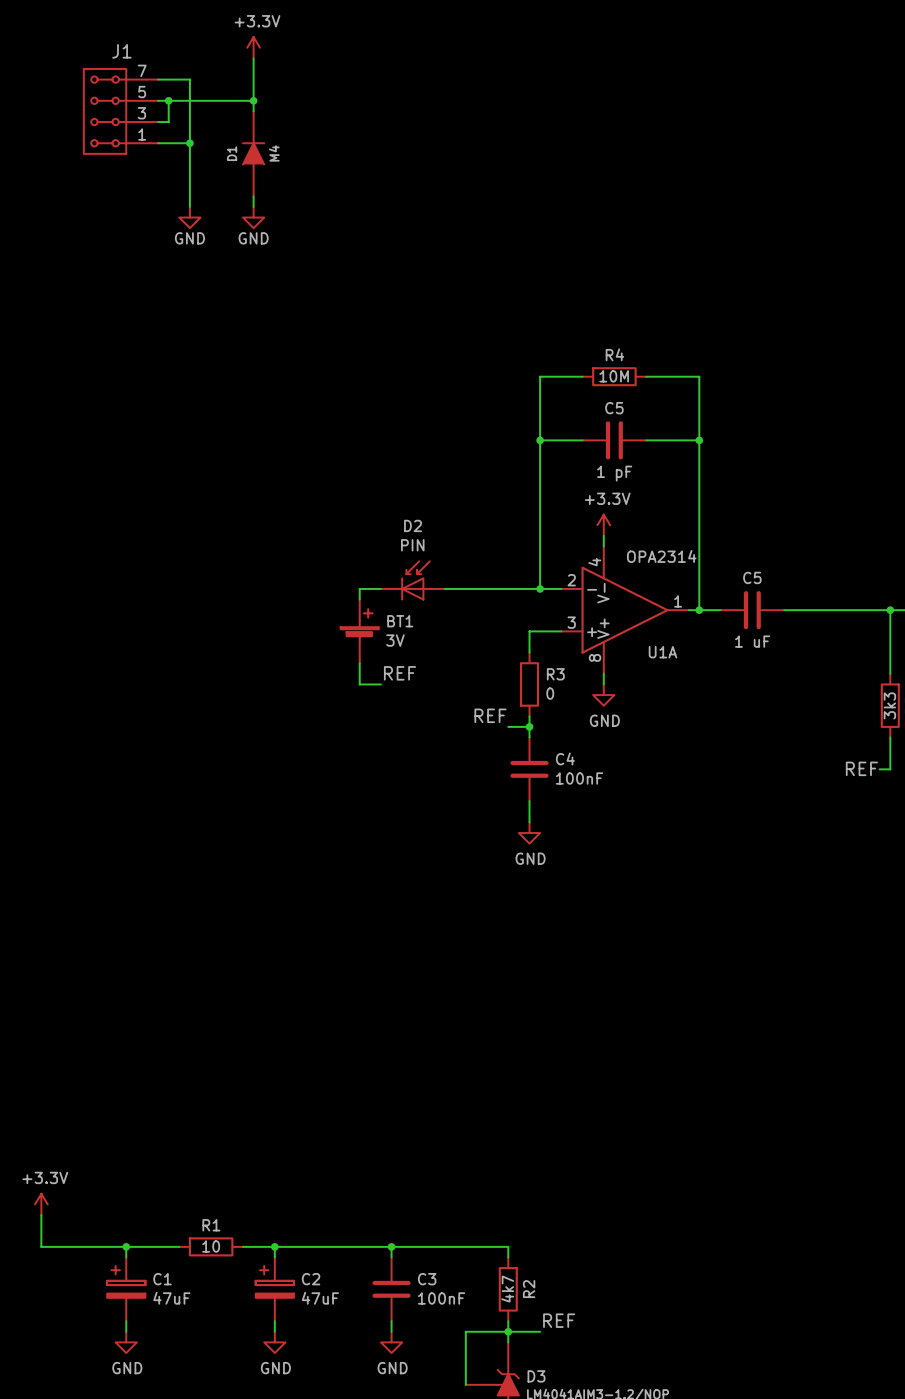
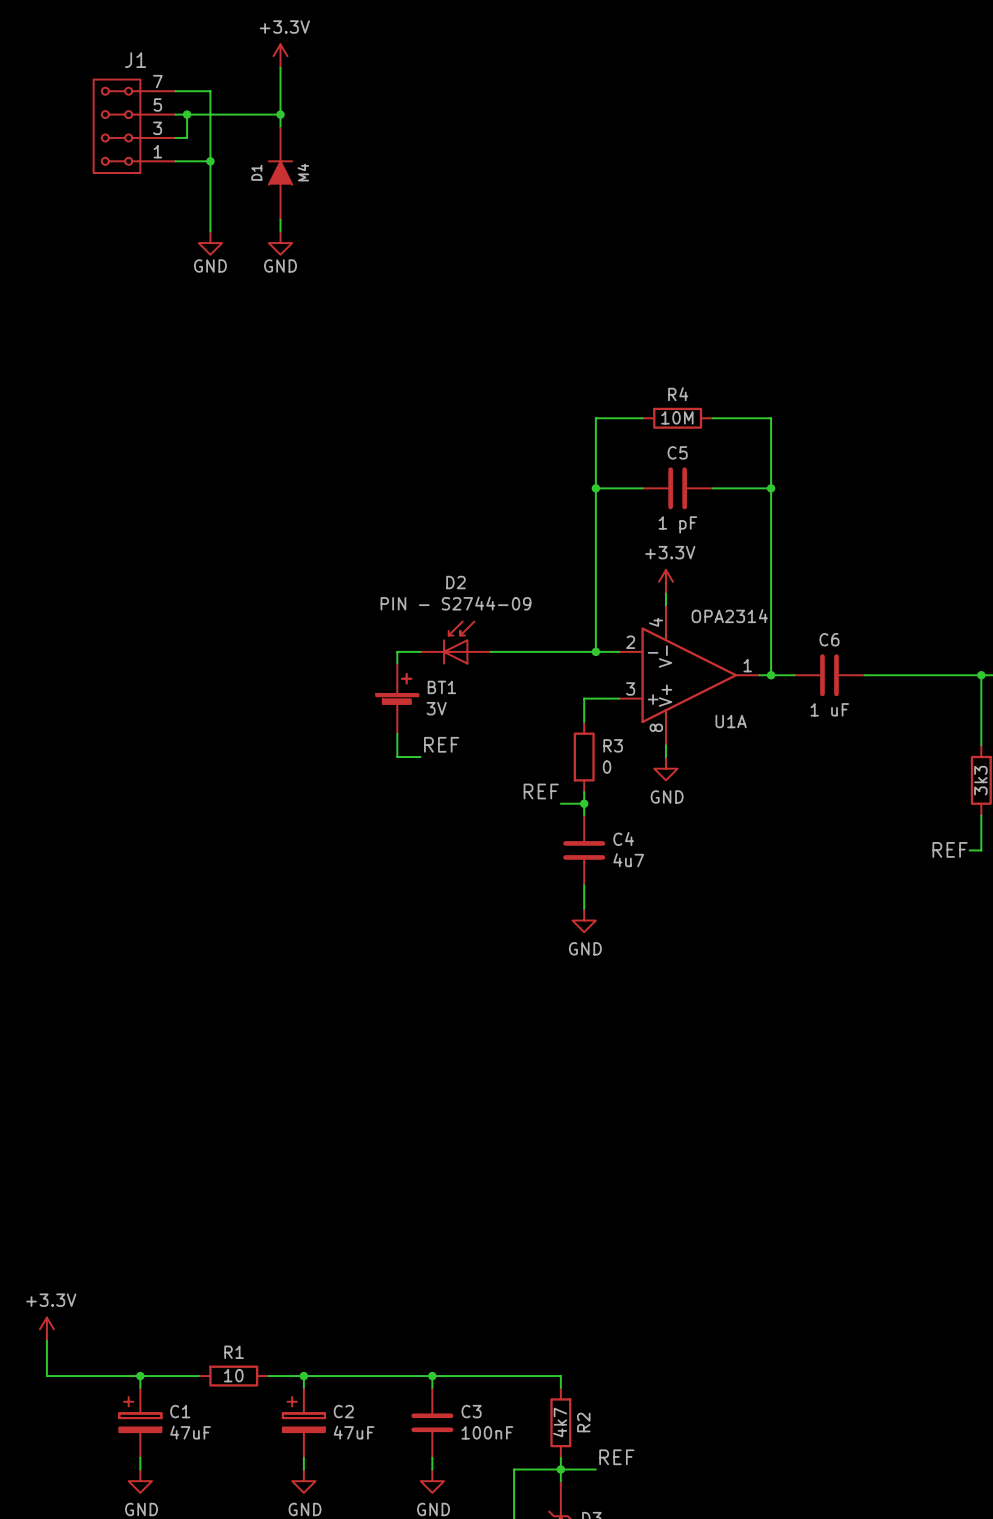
D2 value: PIN (412, 545) -> PIN - S2744-09 (455, 603)
C5 name: C5 (752, 577) -> C6 (829, 639)
C4 value: 100nF (579, 778) -> 4u7 (628, 860)

